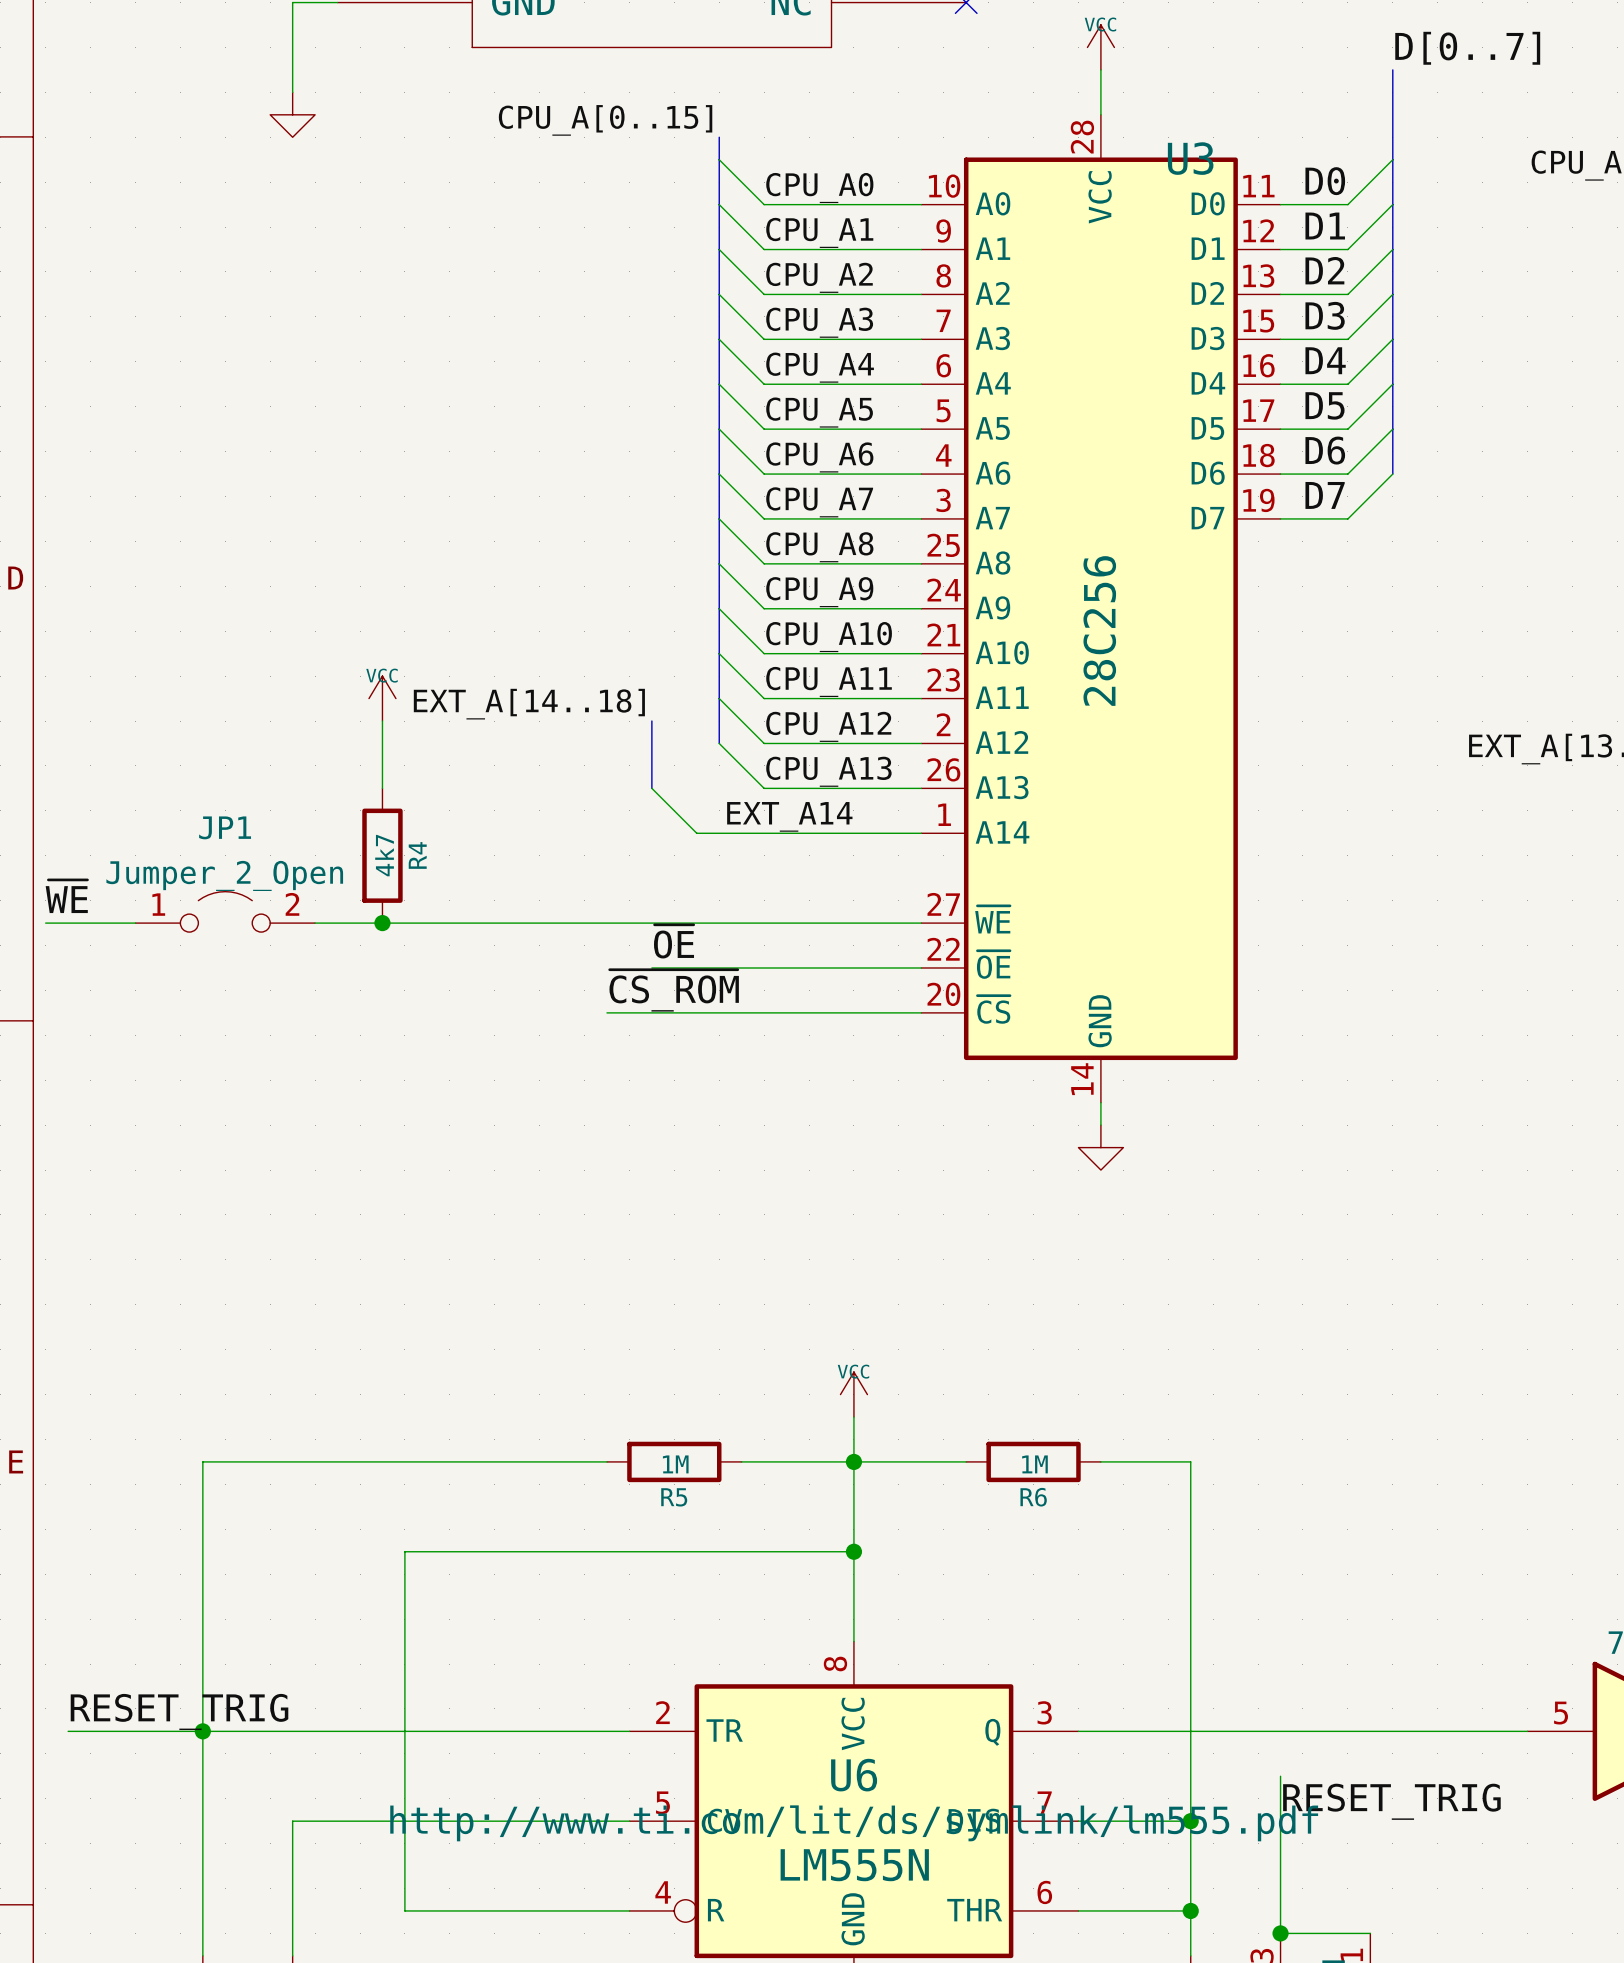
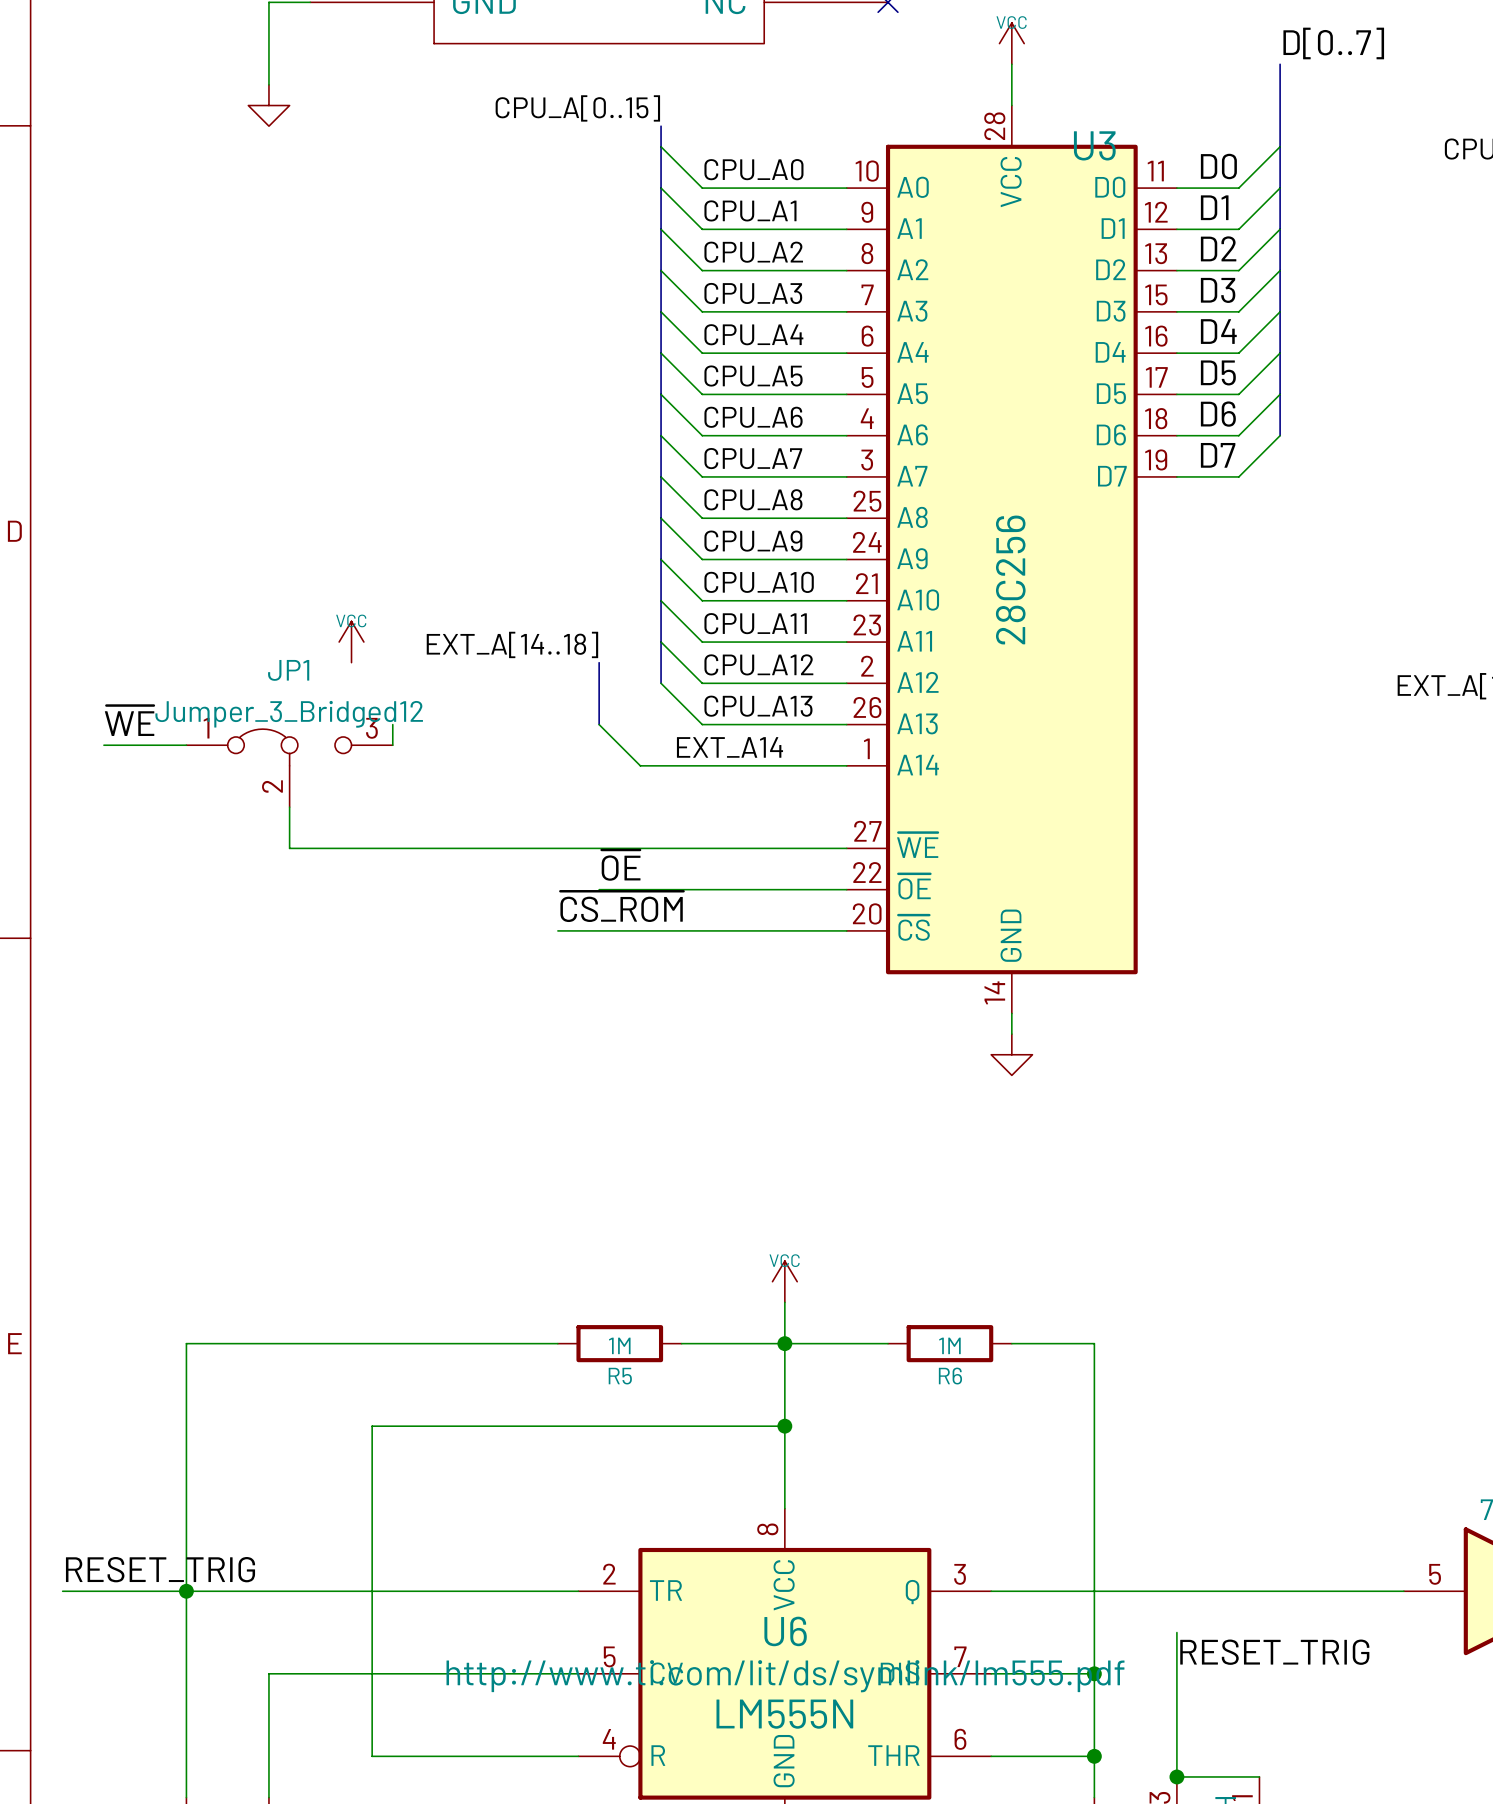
wire: (382, 721) (382, 788) -> none
wire: none -> (392, 724) (392, 745)
R4: 4k7 (382, 855) -> none
JP1 value: Jumper_2_Open (224, 875) -> Jumper_3_Bridged12 (289, 714)
wire: none -> (289, 807) (289, 848)
JP1 symbol: [135, 891, 316, 933] -> [186, 729, 393, 808]
label position: ~{WE} (66, 896) -> ~{WE} (129, 720)
wire: (45, 923) (135, 923) -> (103, 745) (186, 745)
junction: (382, 923) -> none

